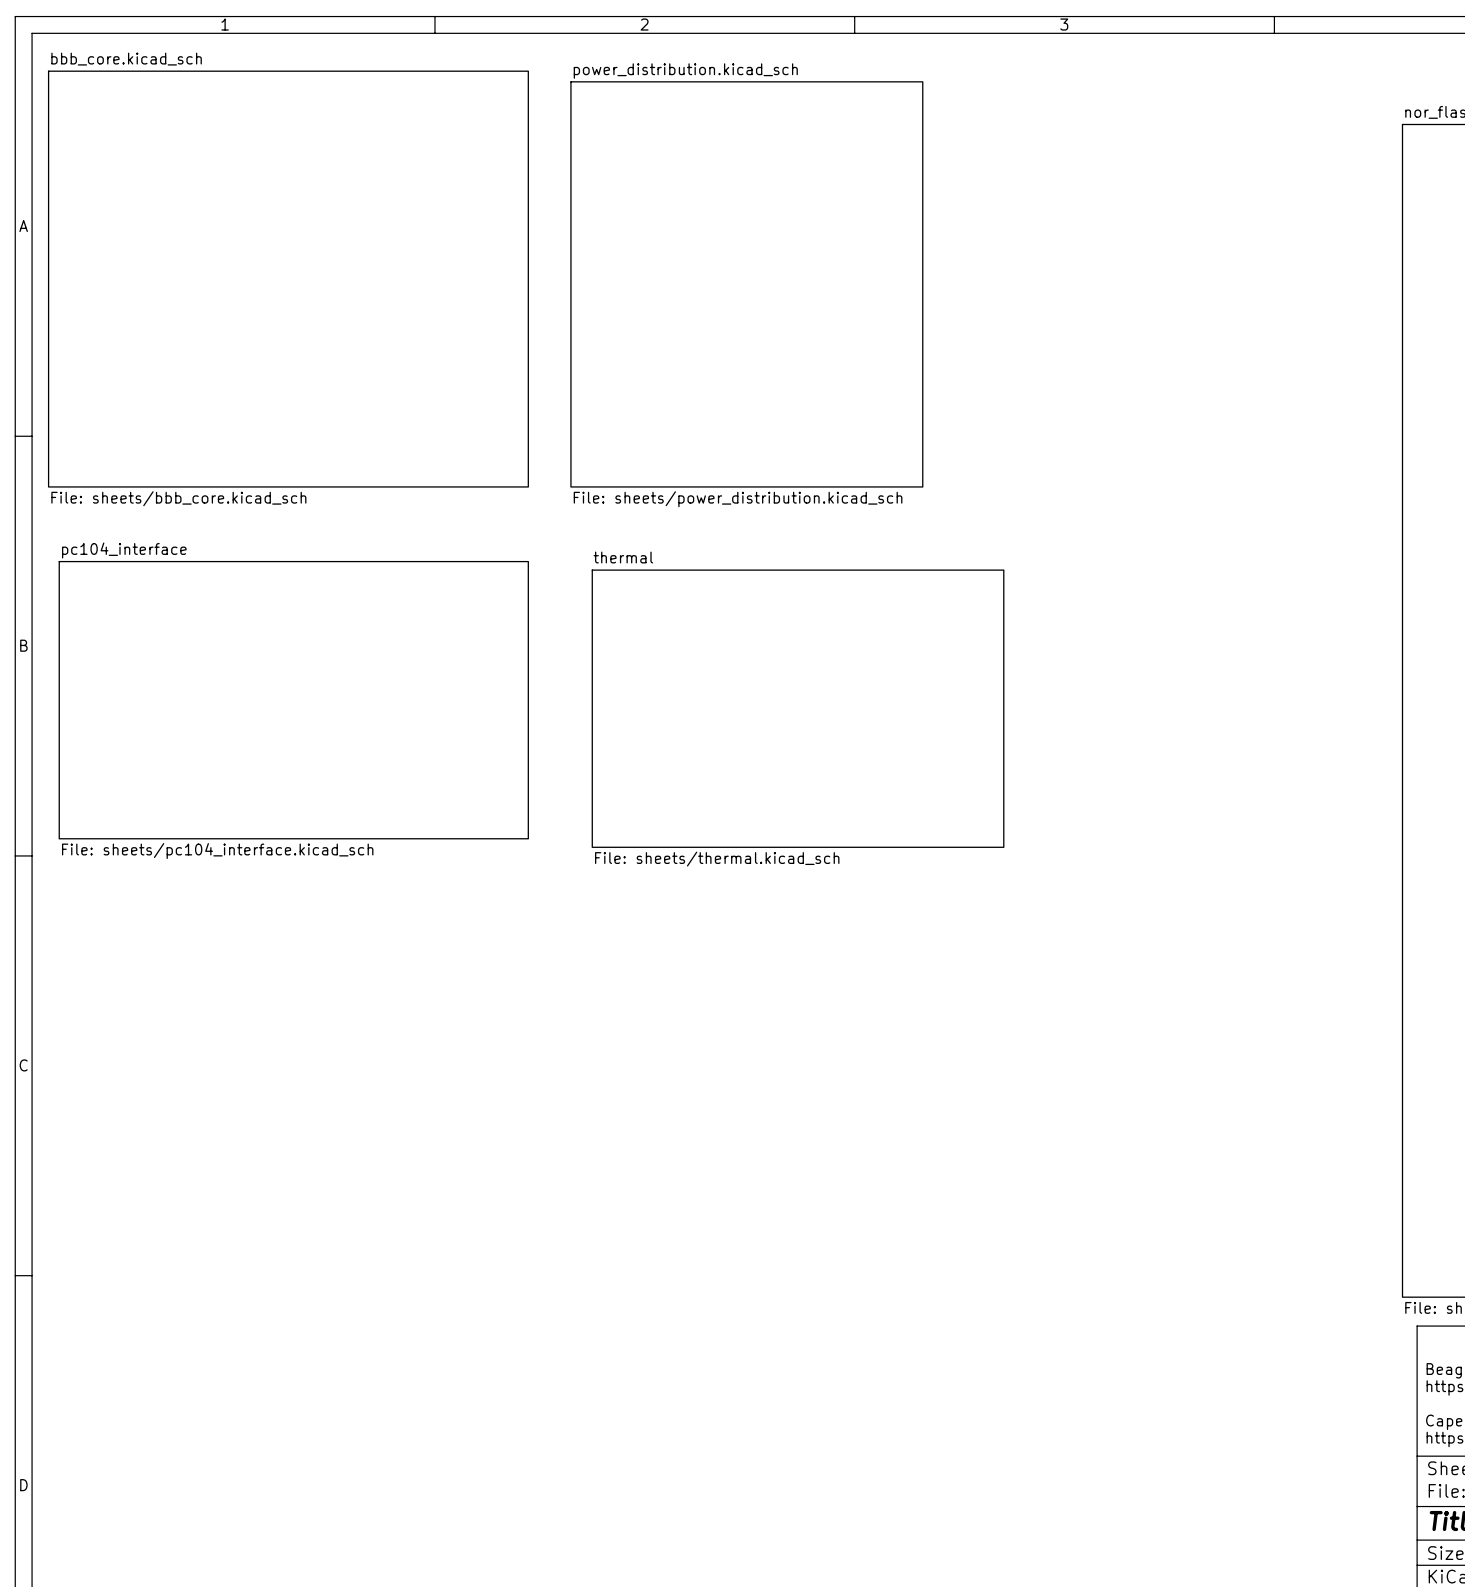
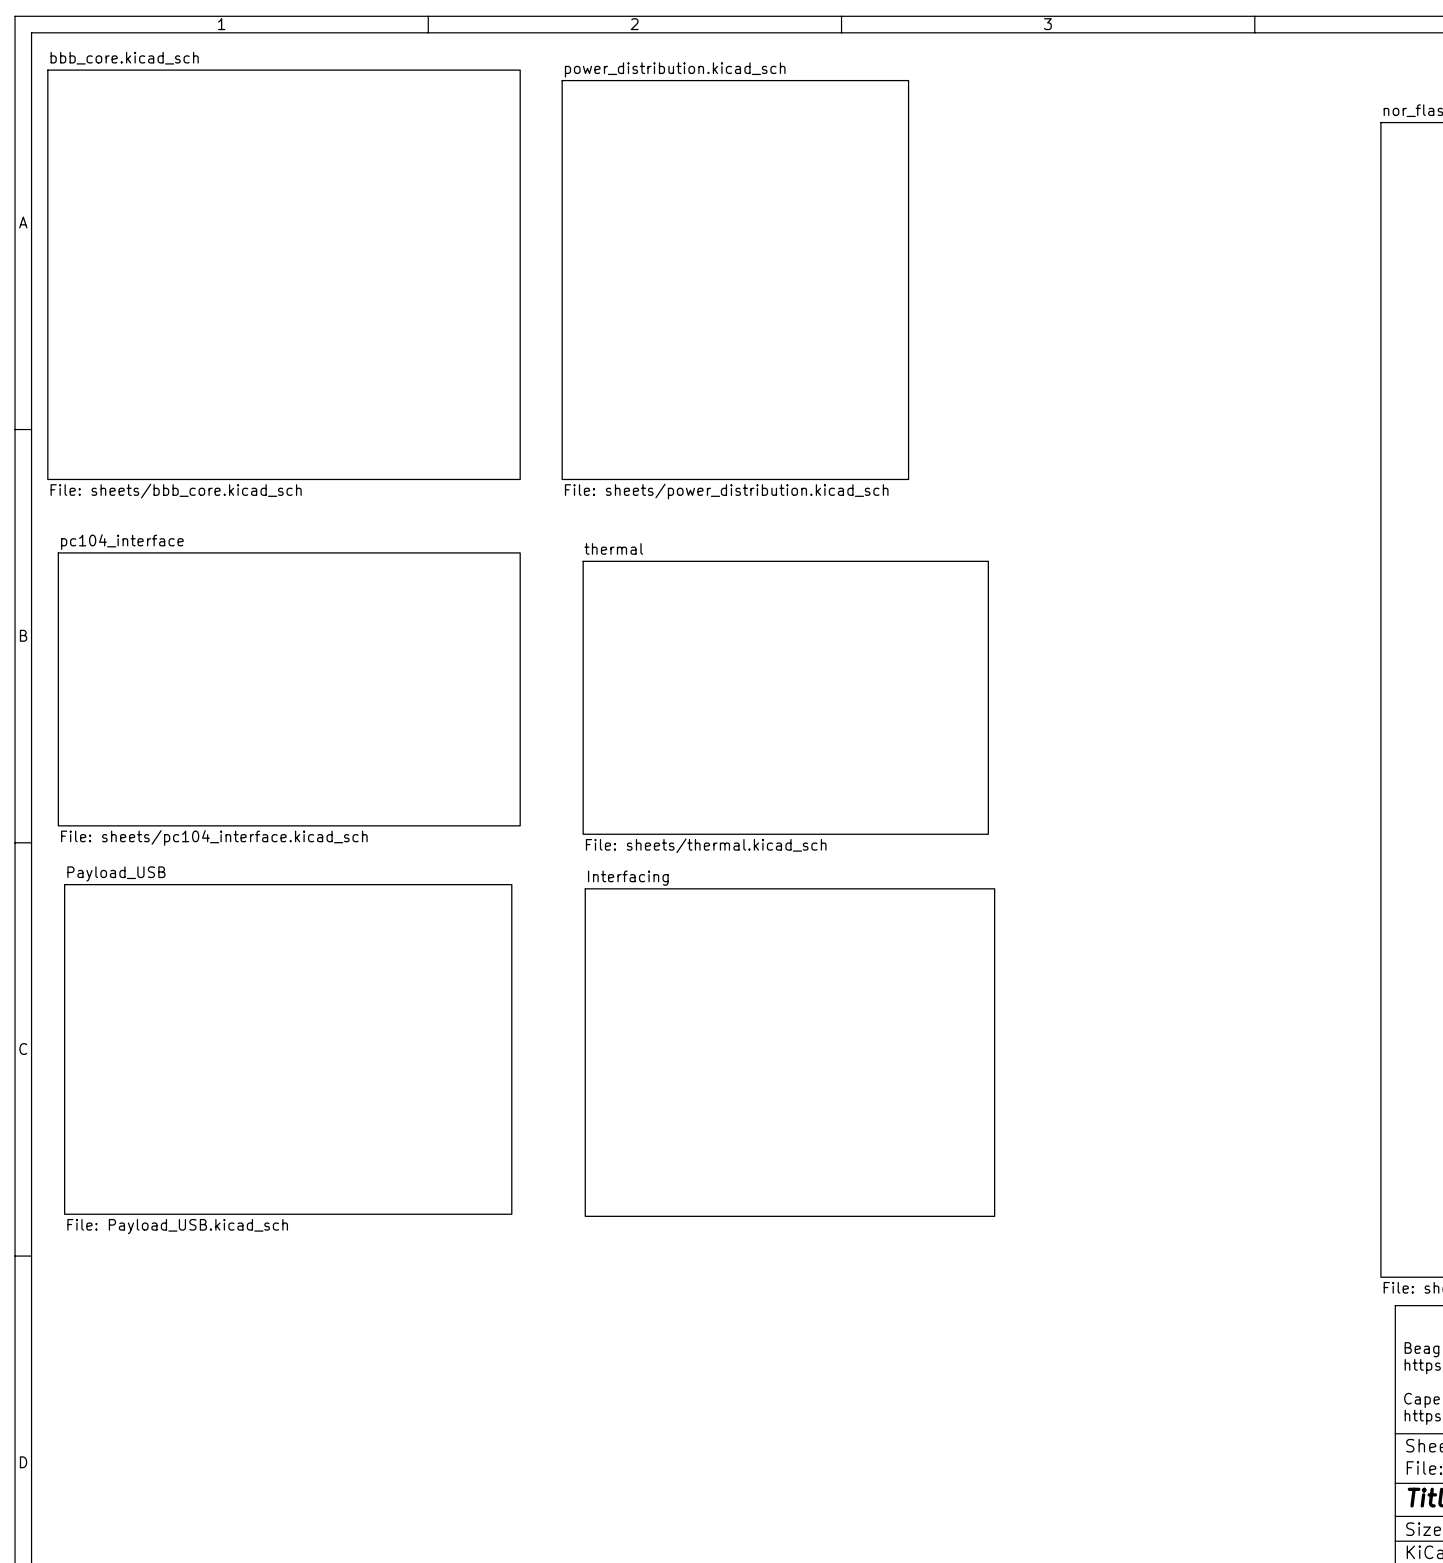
sheet Payload_USB: none -> File: Payload_USB.kicad_sch (288, 1049)
sheet Interfacing: none -> (789, 1052)

